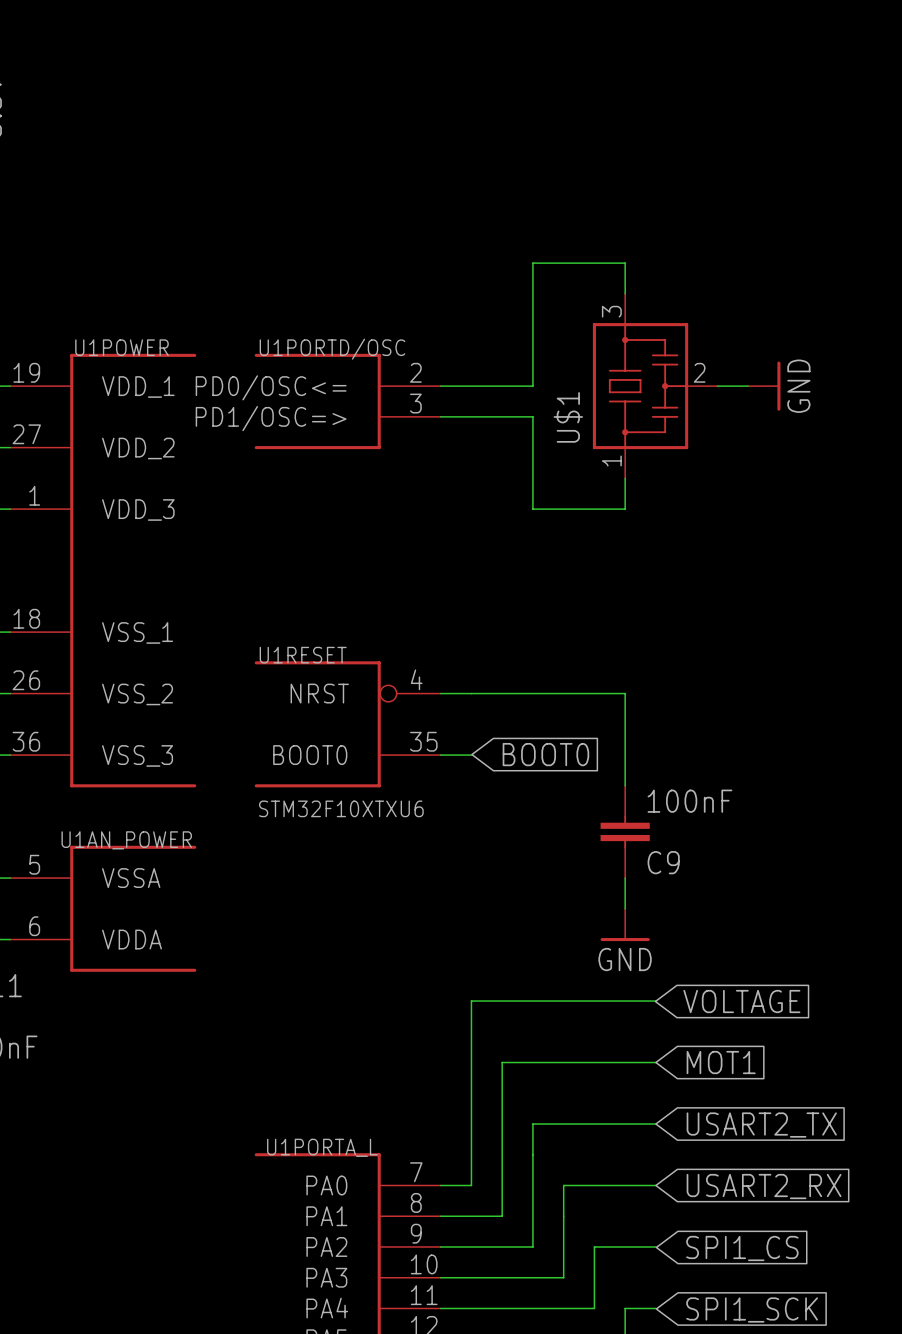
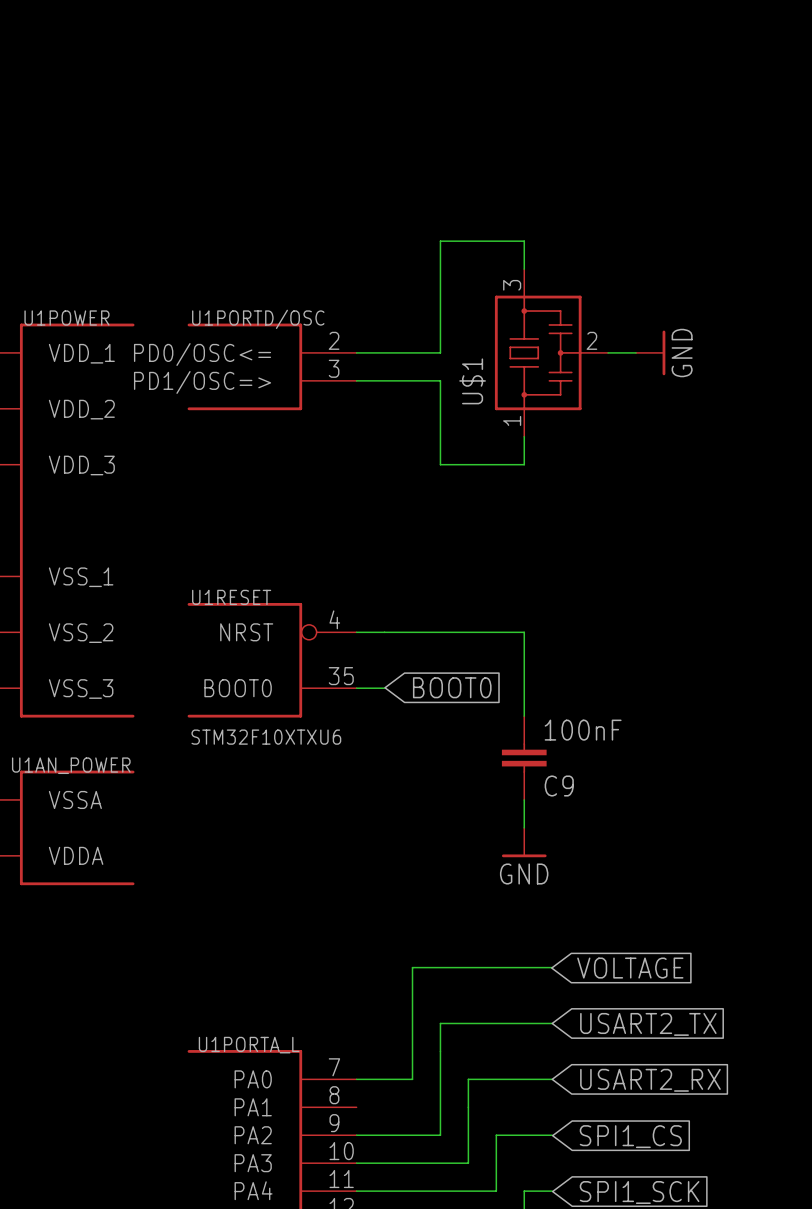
wire: (655, 1001) (471, 1001) (471, 1185) -> none
global label: VOLTAGE (741, 1001) -> none
global label: MOT1 (721, 1062) -> VOLTAGE (630, 968)
wire: (502, 1185) (502, 1216) (440, 1216) -> (412, 1079) (384, 1079)

